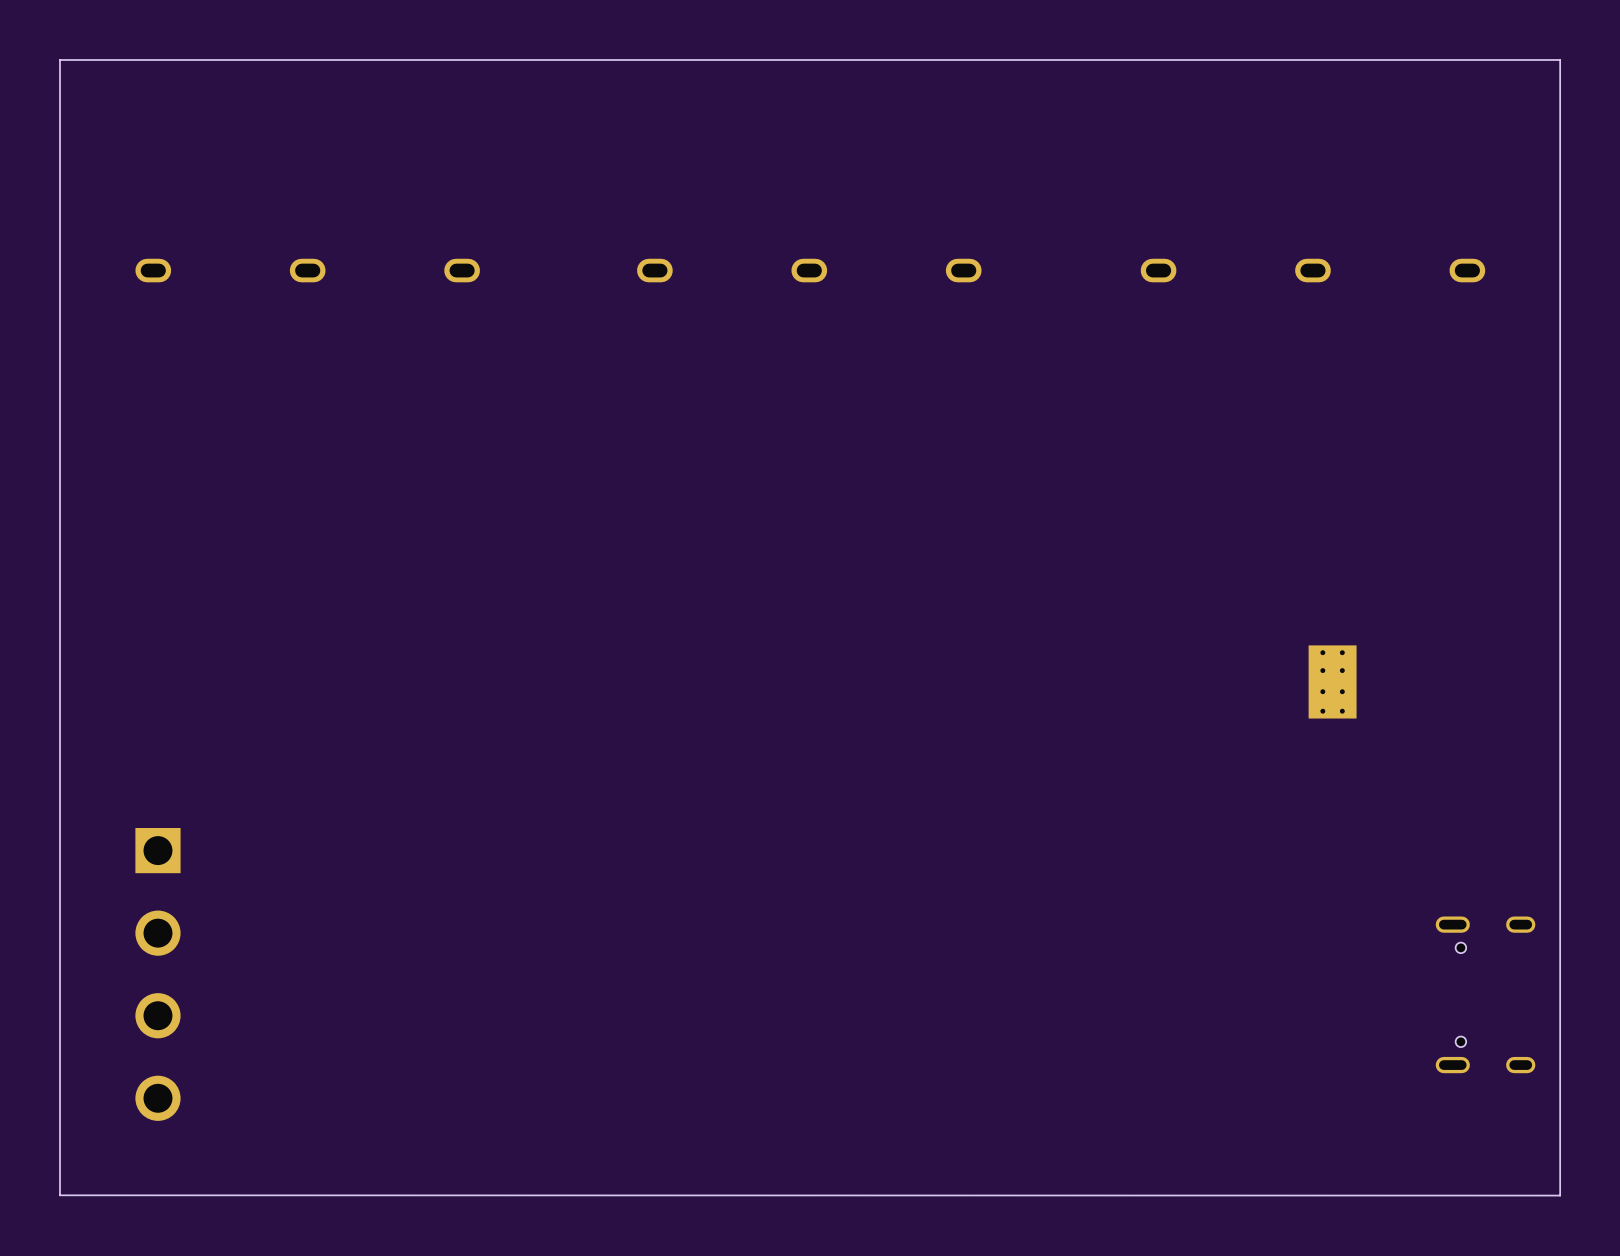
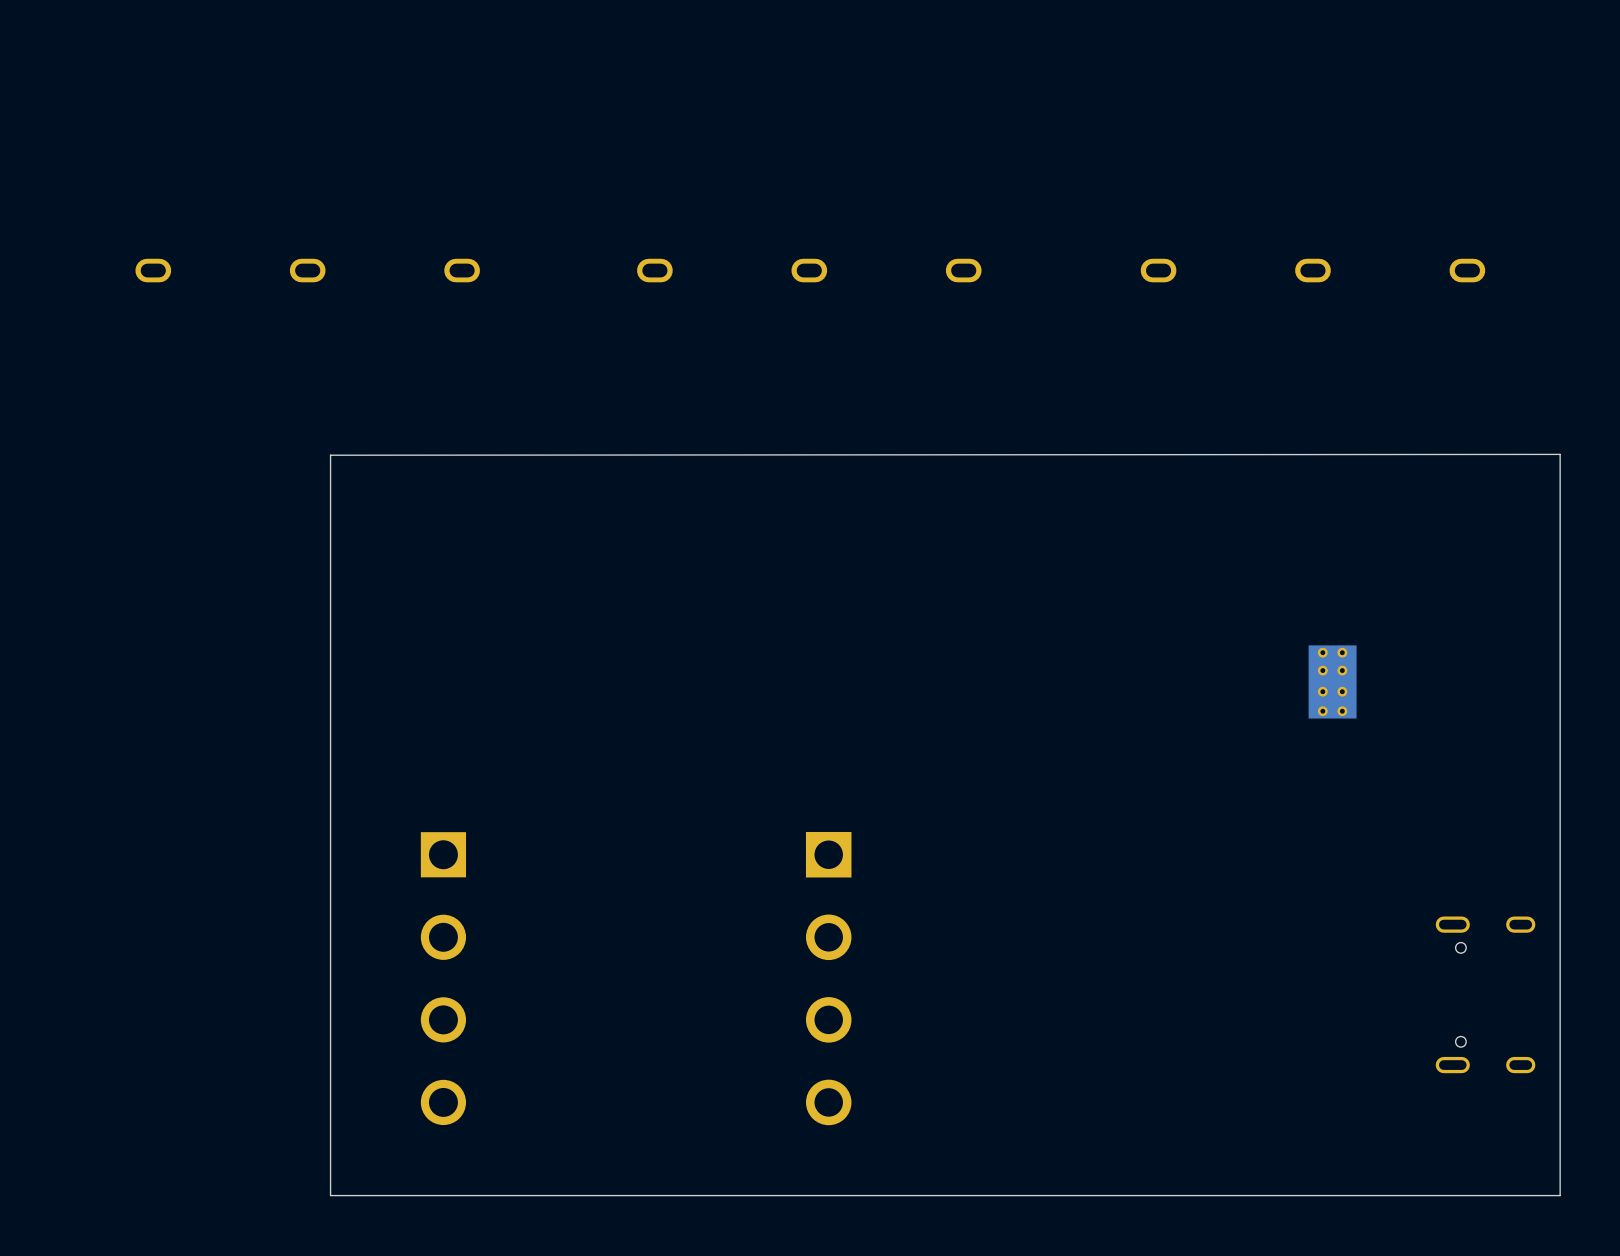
board edge: (1560, 454) (1560, 59) (59, 59) (59, 1195) (1560, 1195) -> (1560, 454) (330, 455) (330, 1195) (1560, 1195)
part position: (157, 974) -> (443, 978)
part: none -> (828, 978)

